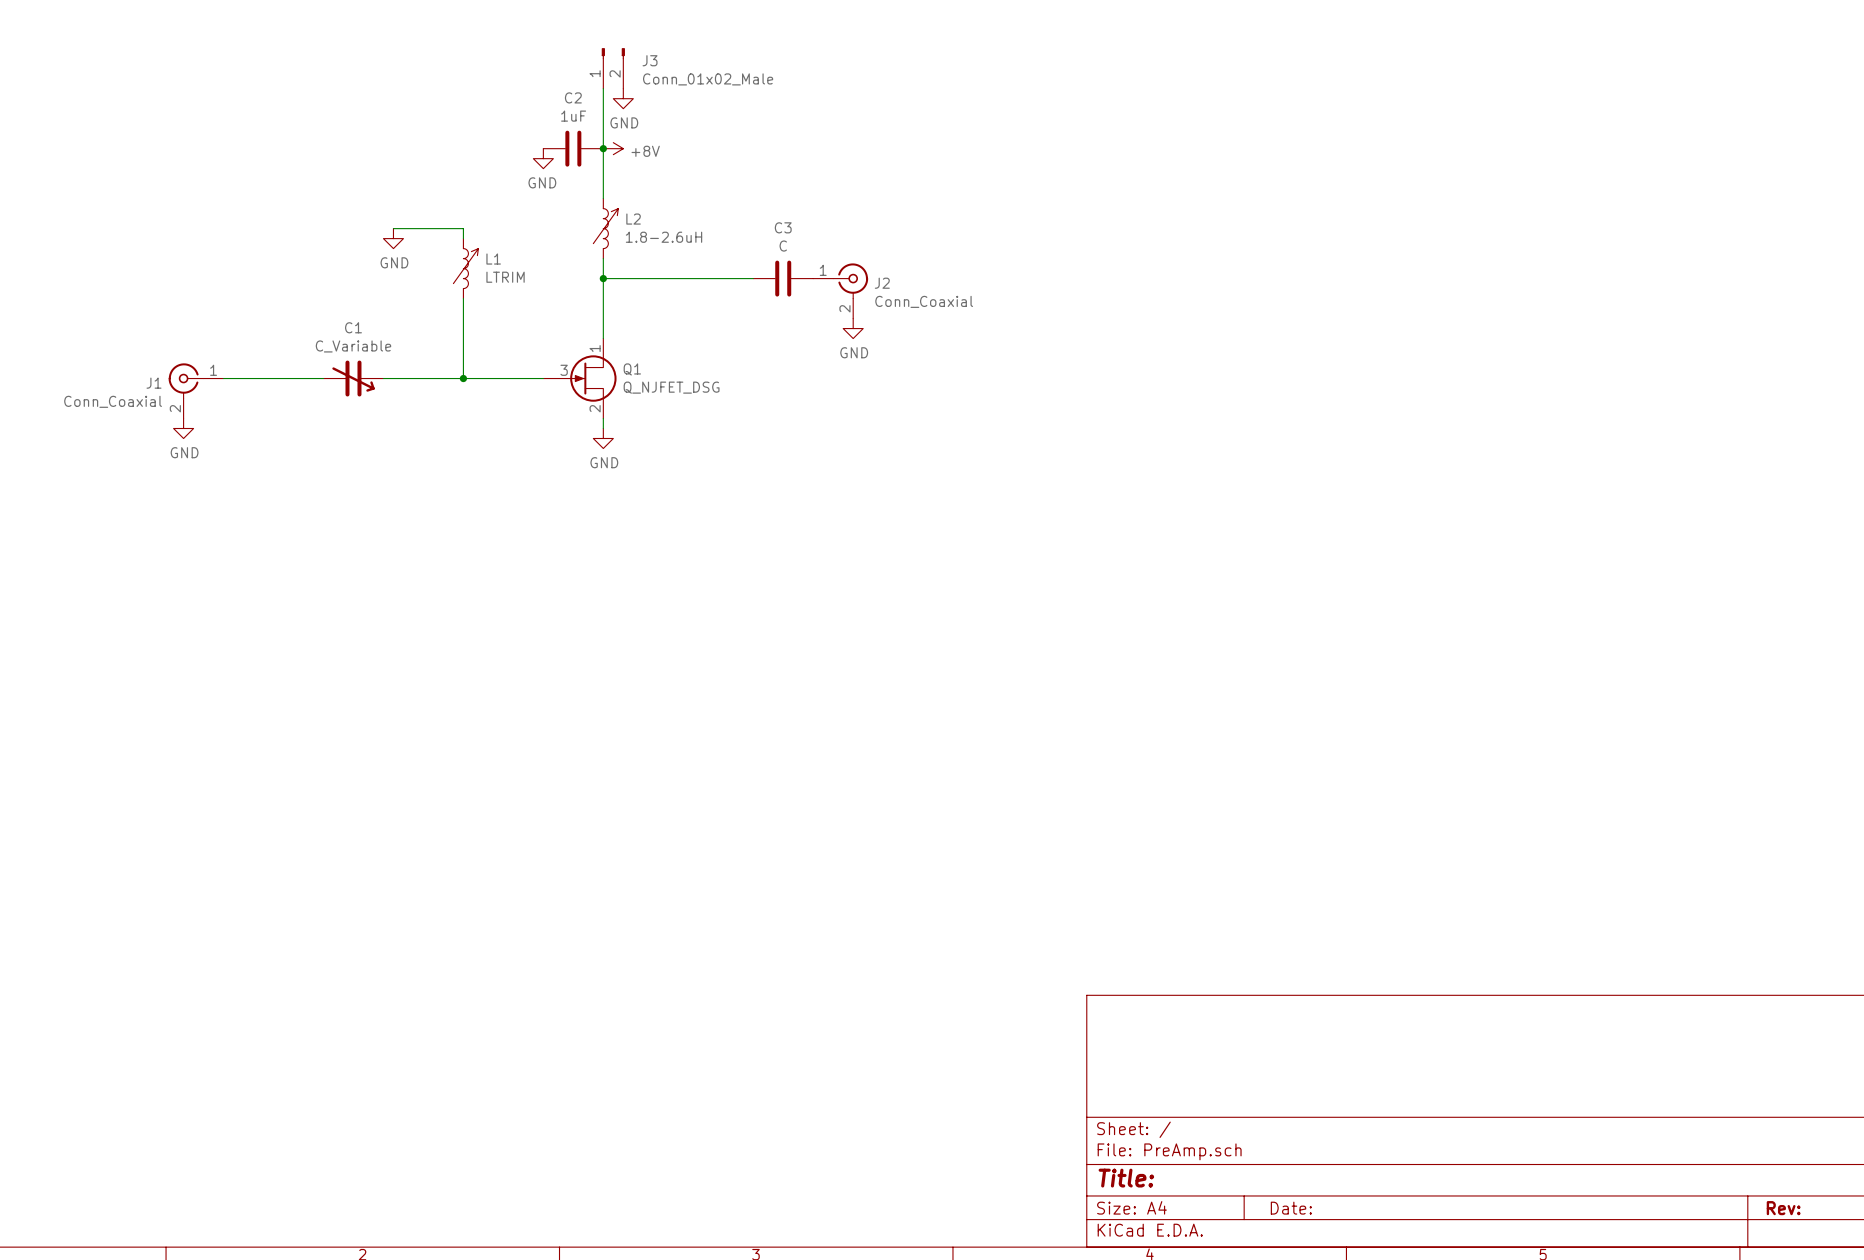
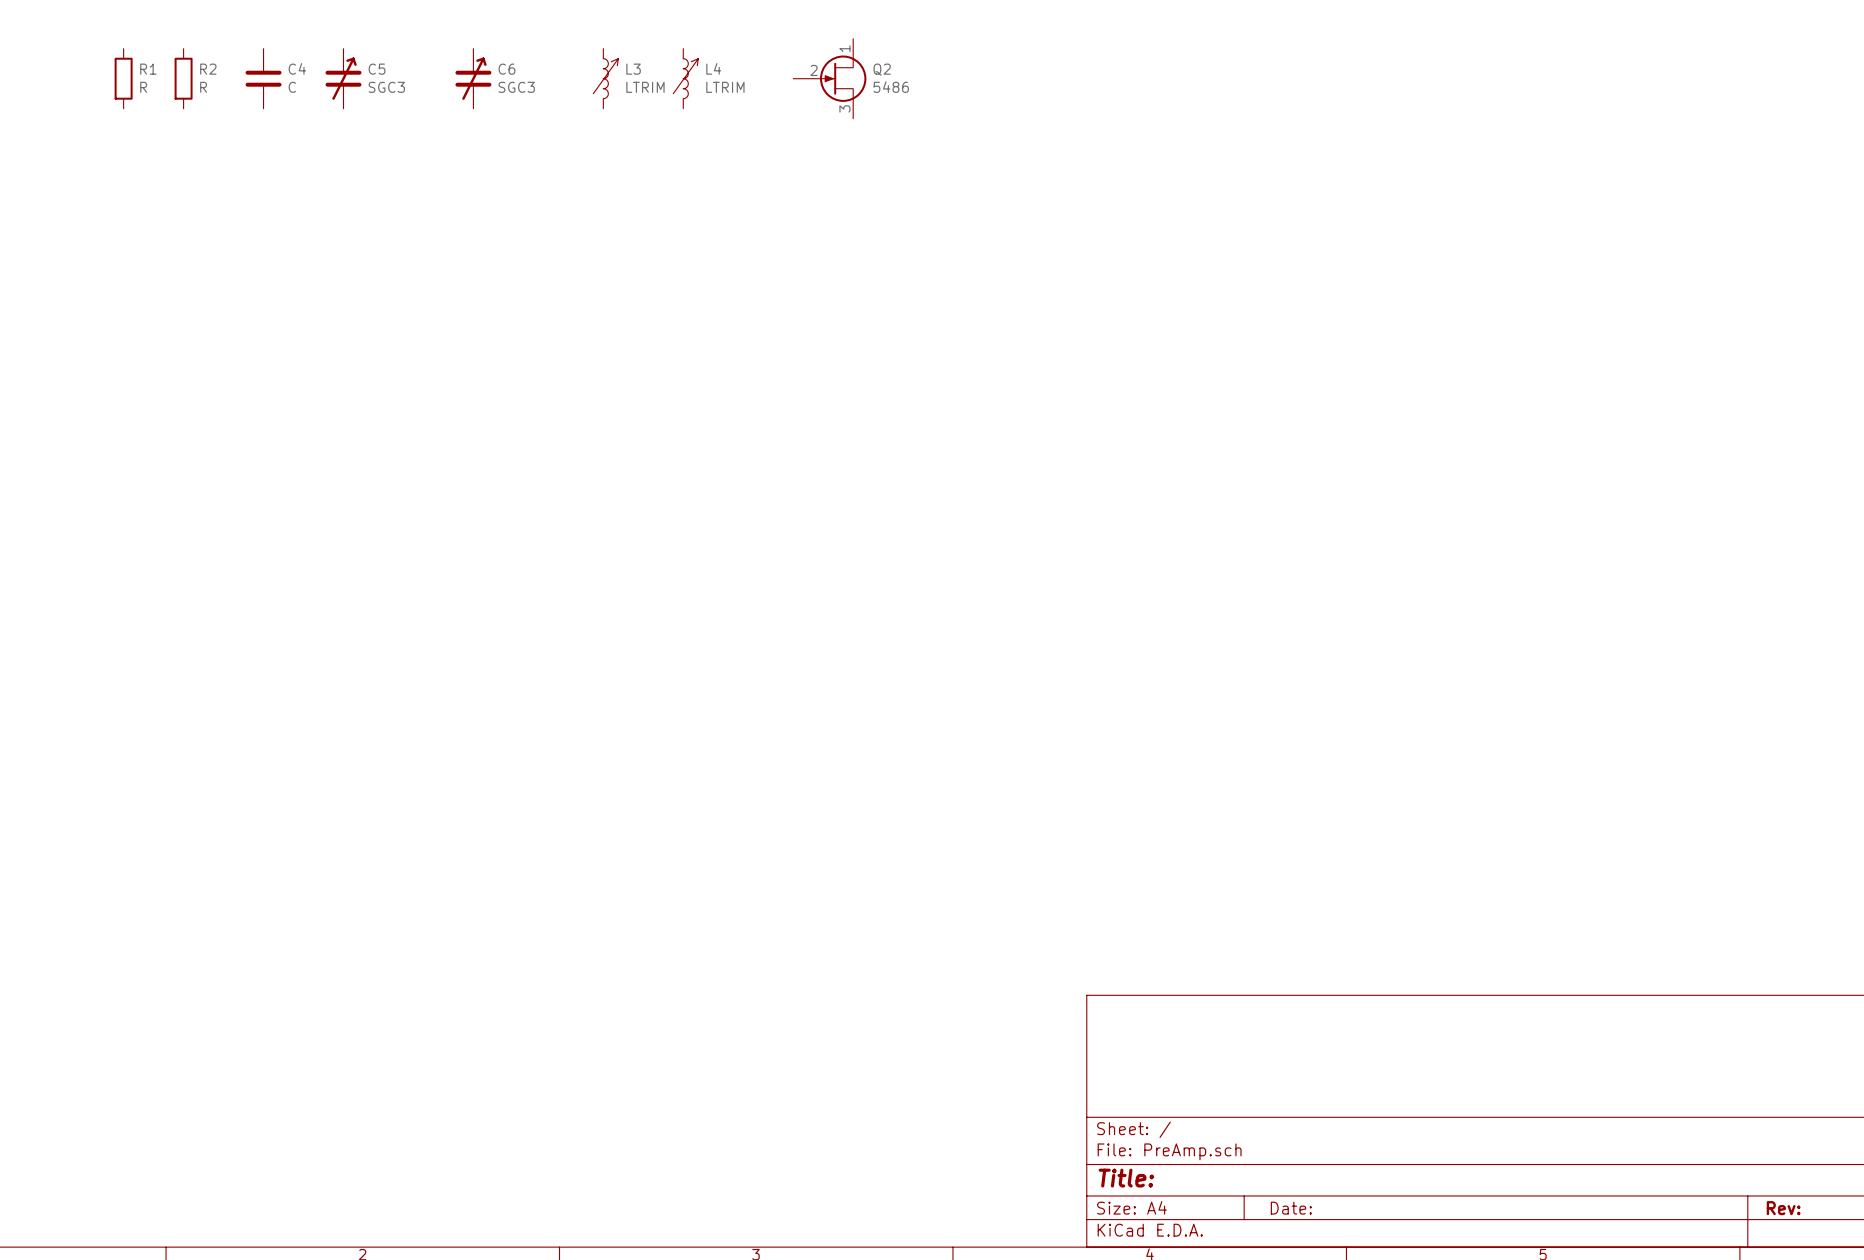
J3: Conn_01x02_Male (613, 68) -> none
R1: none -> R (123, 78)
R2: none -> R (183, 78)
C4: none -> C (263, 78)
C5: none -> SGC3 (343, 78)
C6: none -> SGC3 (473, 78)
L3: none -> LTRIM (605, 78)
L4: none -> LTRIM (685, 78)
Q2: none -> 5486 (829, 78)
wire: (603, 88) (603, 198) -> none
power symbol: GND (623, 98) -> none
C2: 1uF (573, 148) -> none
junction: (603, 148) -> none
power symbol: +8V (613, 148) -> none
power symbol: GND (543, 158) -> none
wire: (393, 228) (463, 228) (463, 238) -> none
L2: 1.8-2.6uH (605, 228) -> none
power symbol: GND (393, 238) -> none
wire: (603, 258) (603, 338) -> none
L1: LTRIM (465, 268) -> none
wire: (603, 278) (753, 278) -> none
junction: (603, 278) -> none
C3: C (783, 278) -> none
J2: Conn_Coaxial (840, 290) -> none
wire: (463, 298) (463, 378) -> none
power symbol: GND (853, 328) -> none
wire: (223, 378) (323, 378) -> none
C1: C_Variable (353, 378) -> none
wire: (383, 378) (543, 378) -> none
junction: (463, 378) -> none
Q1: Q_NJFET_DSG (579, 378) -> none
J1: Conn_Coaxial (196, 390) -> none
wire: (603, 418) (603, 428) -> none
power symbol: GND (183, 428) -> none
power symbol: GND (603, 438) -> none

